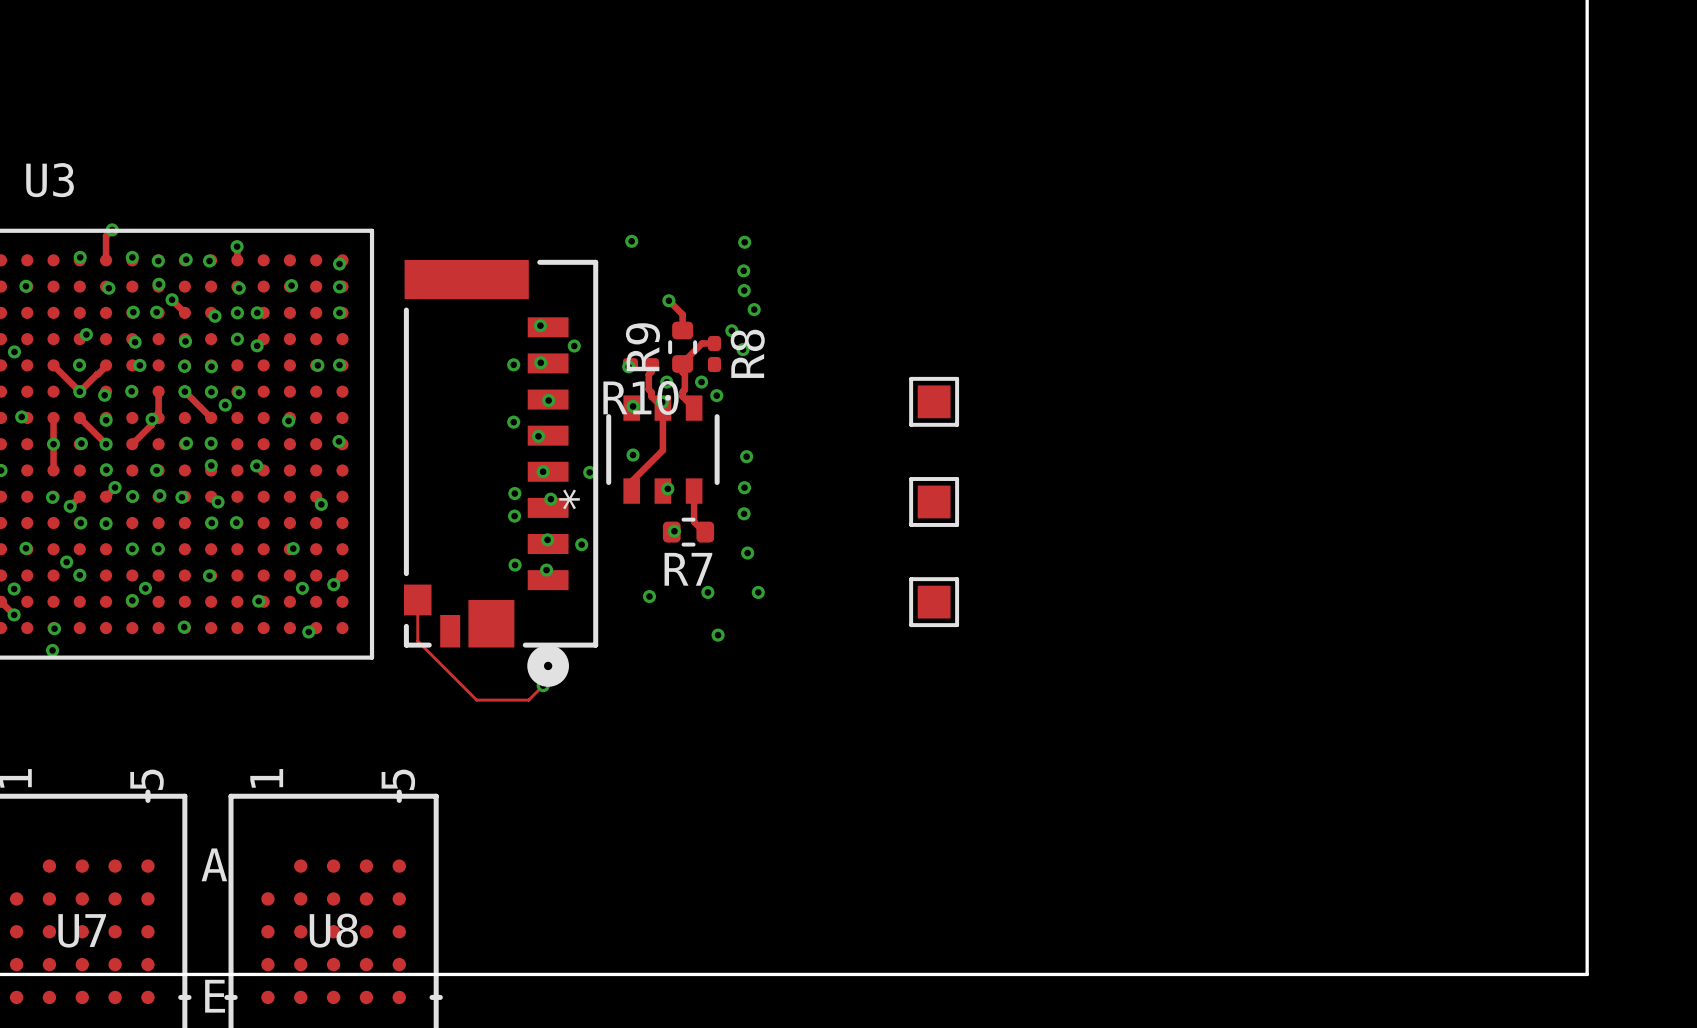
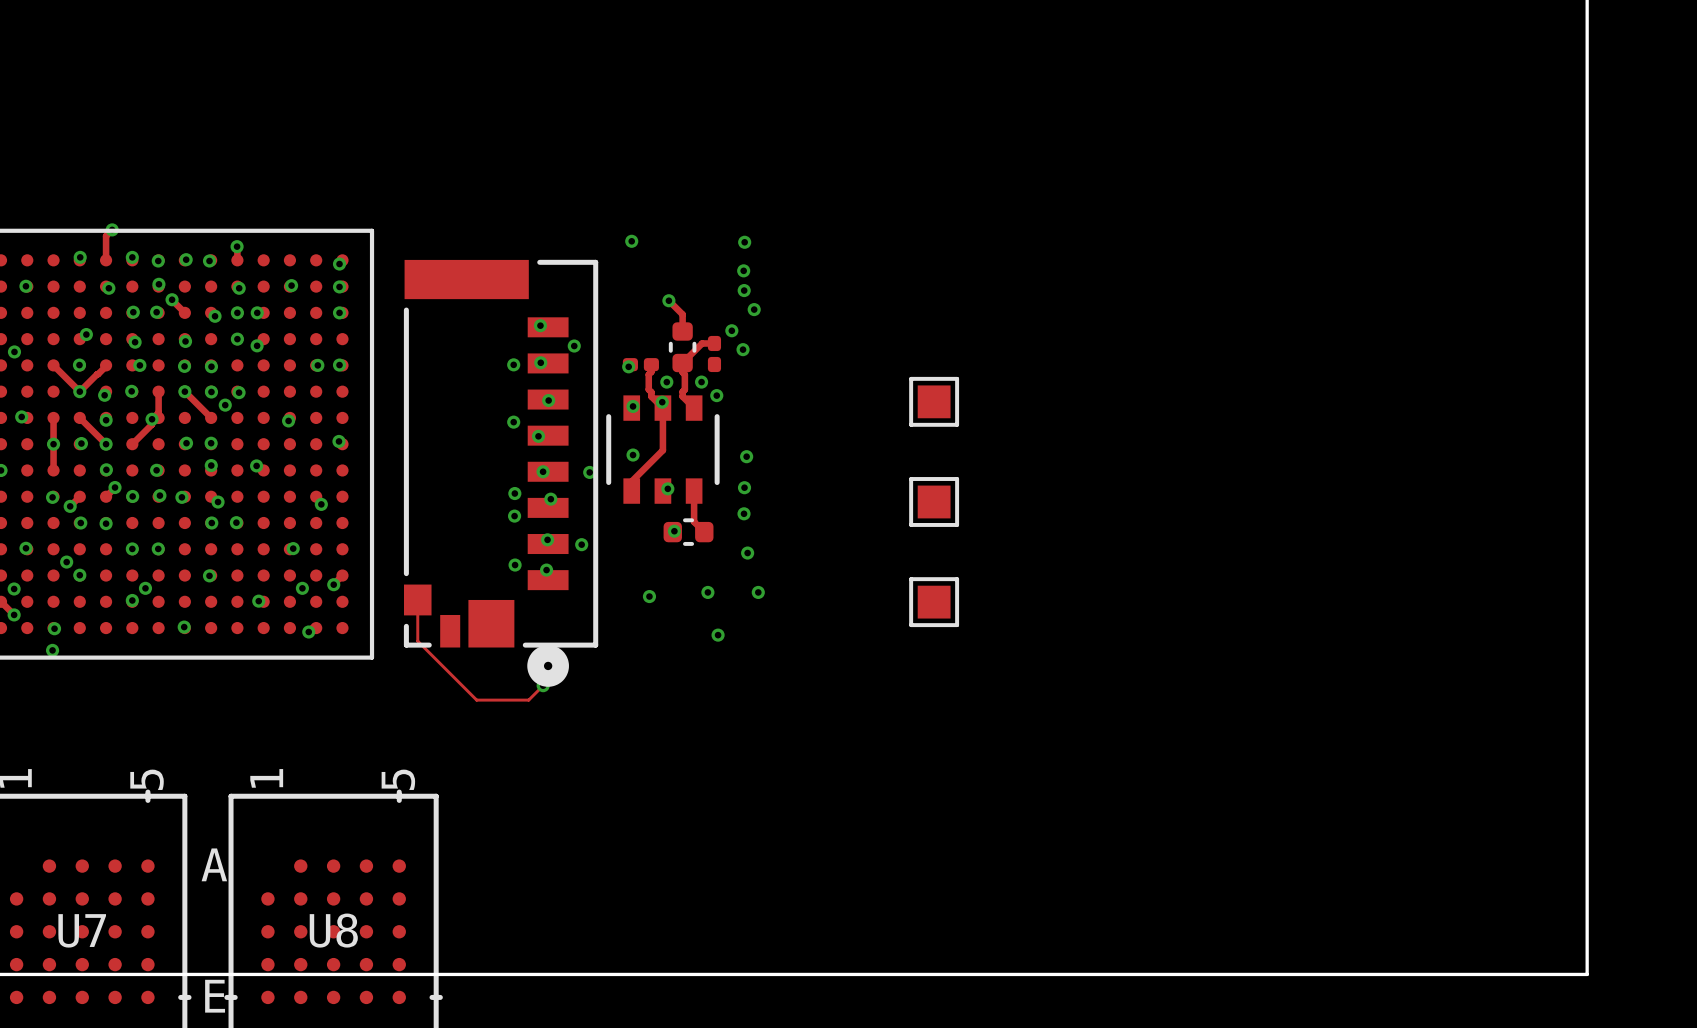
U3 name: U3 (50, 180) -> none
R9: (682, 347) -> none
part: none -> (682, 347)
R8 name: R8 (747, 353) -> none
R10 name: R10 (641, 397) -> none
part text: * (569, 499) -> none
R7: (688, 532) -> none
part: none -> (688, 532)

